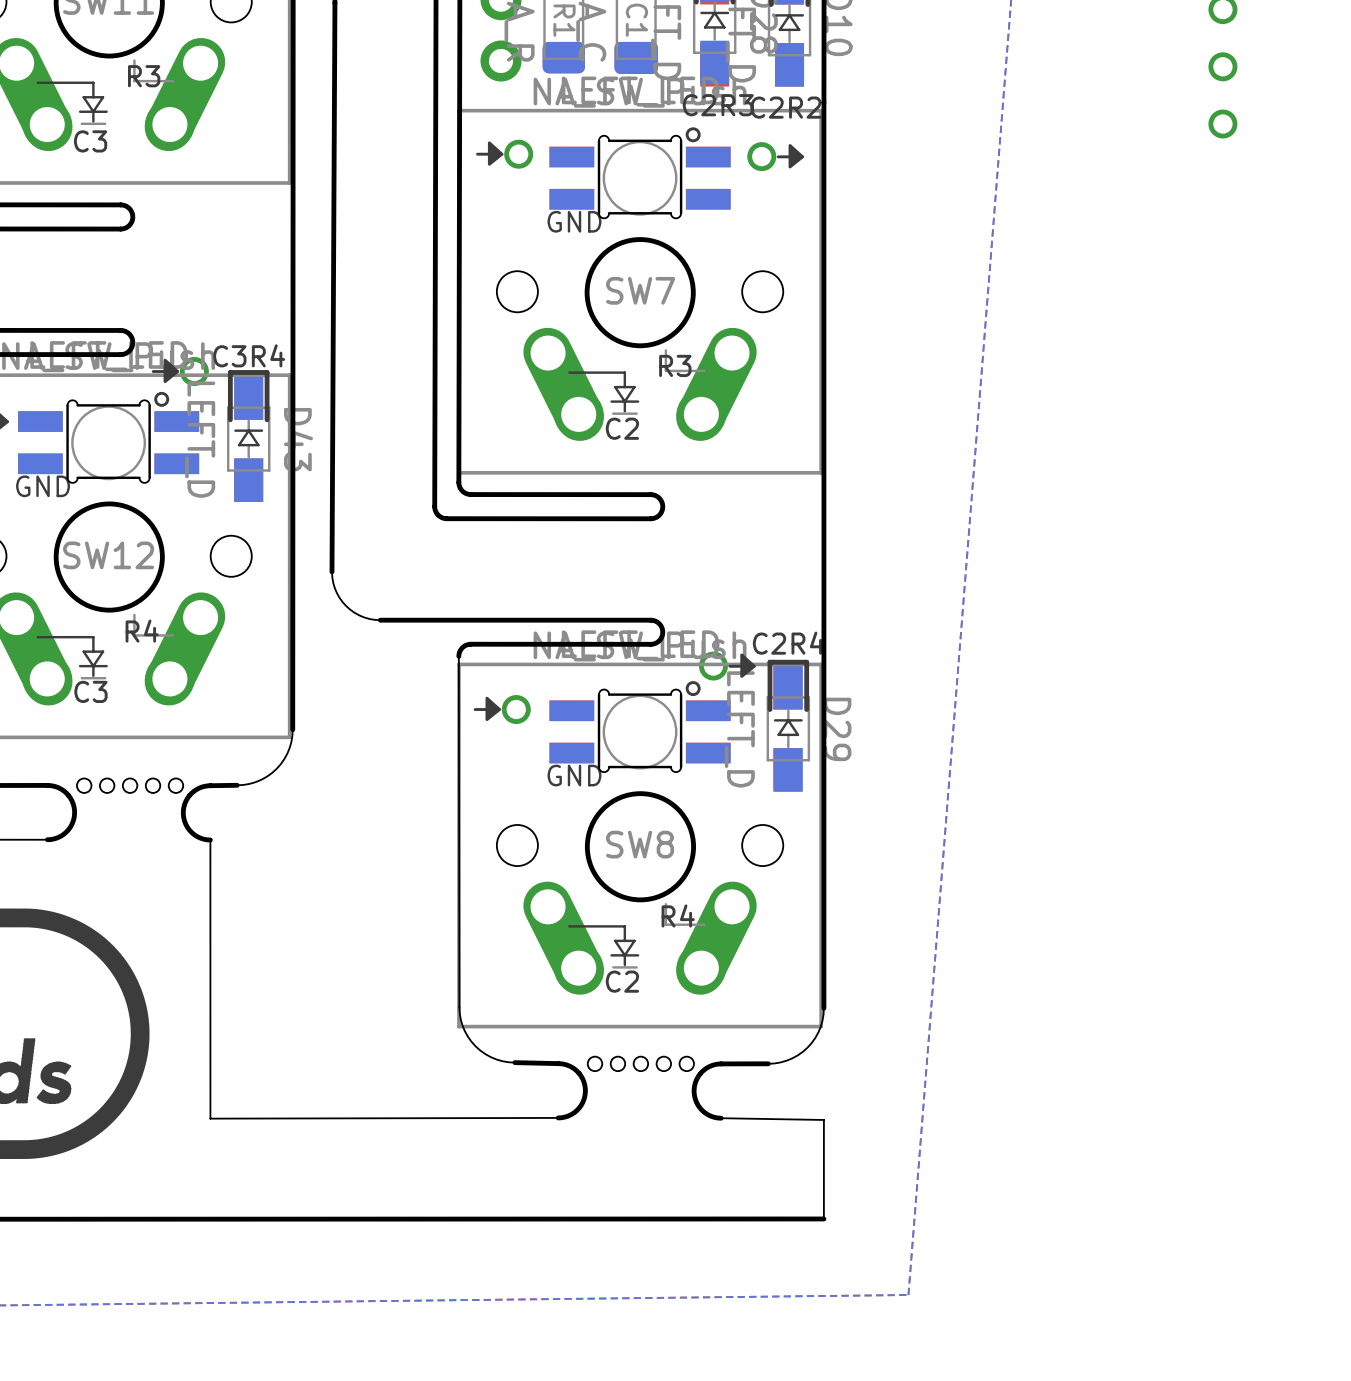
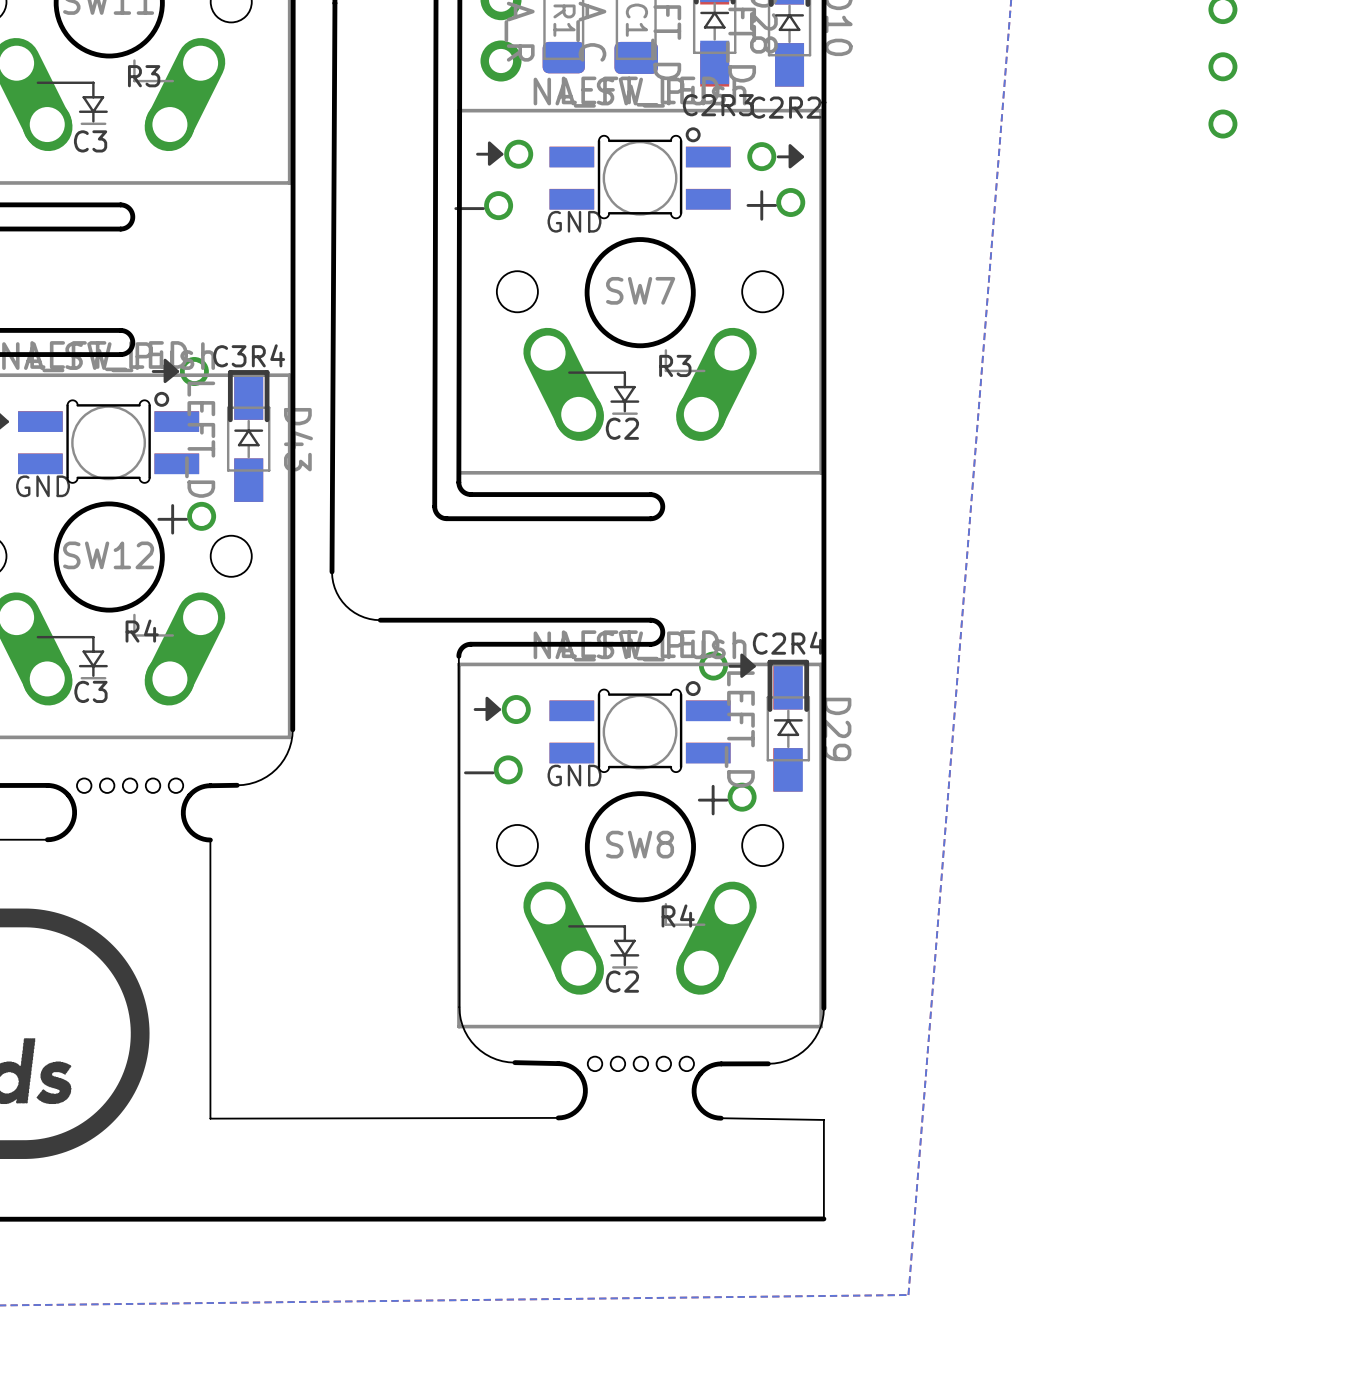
part: none -> (790, 202)
part: none -> (498, 205)
part: none -> (201, 516)
part: none -> (508, 769)
part: none -> (742, 797)

